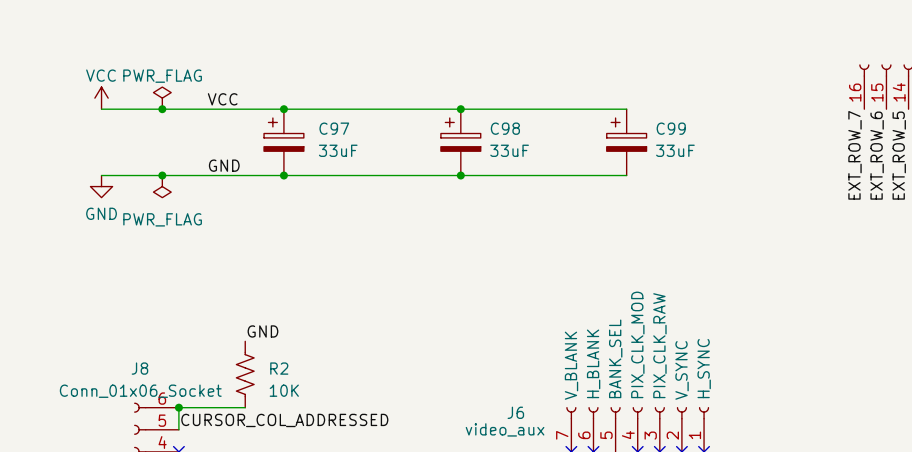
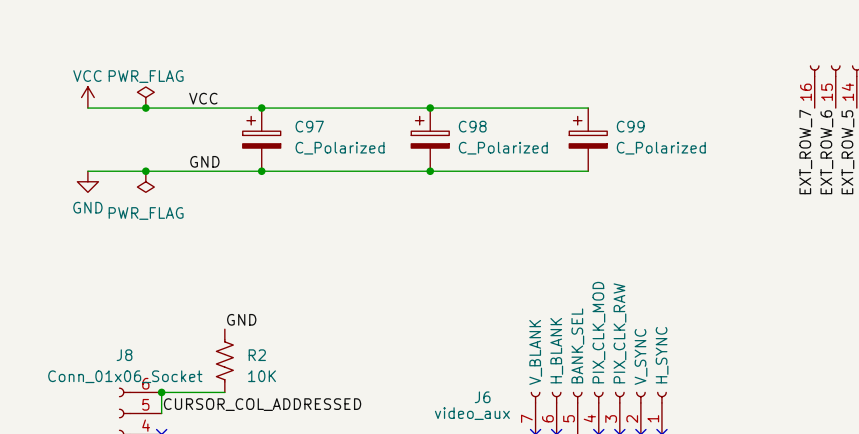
C97 value: 33uF (338, 150) -> C_Polarized (340, 148)
C98 value: 33uF (509, 150) -> C_Polarized (503, 148)
C99 value: 33uF (675, 150) -> C_Polarized (661, 148)

